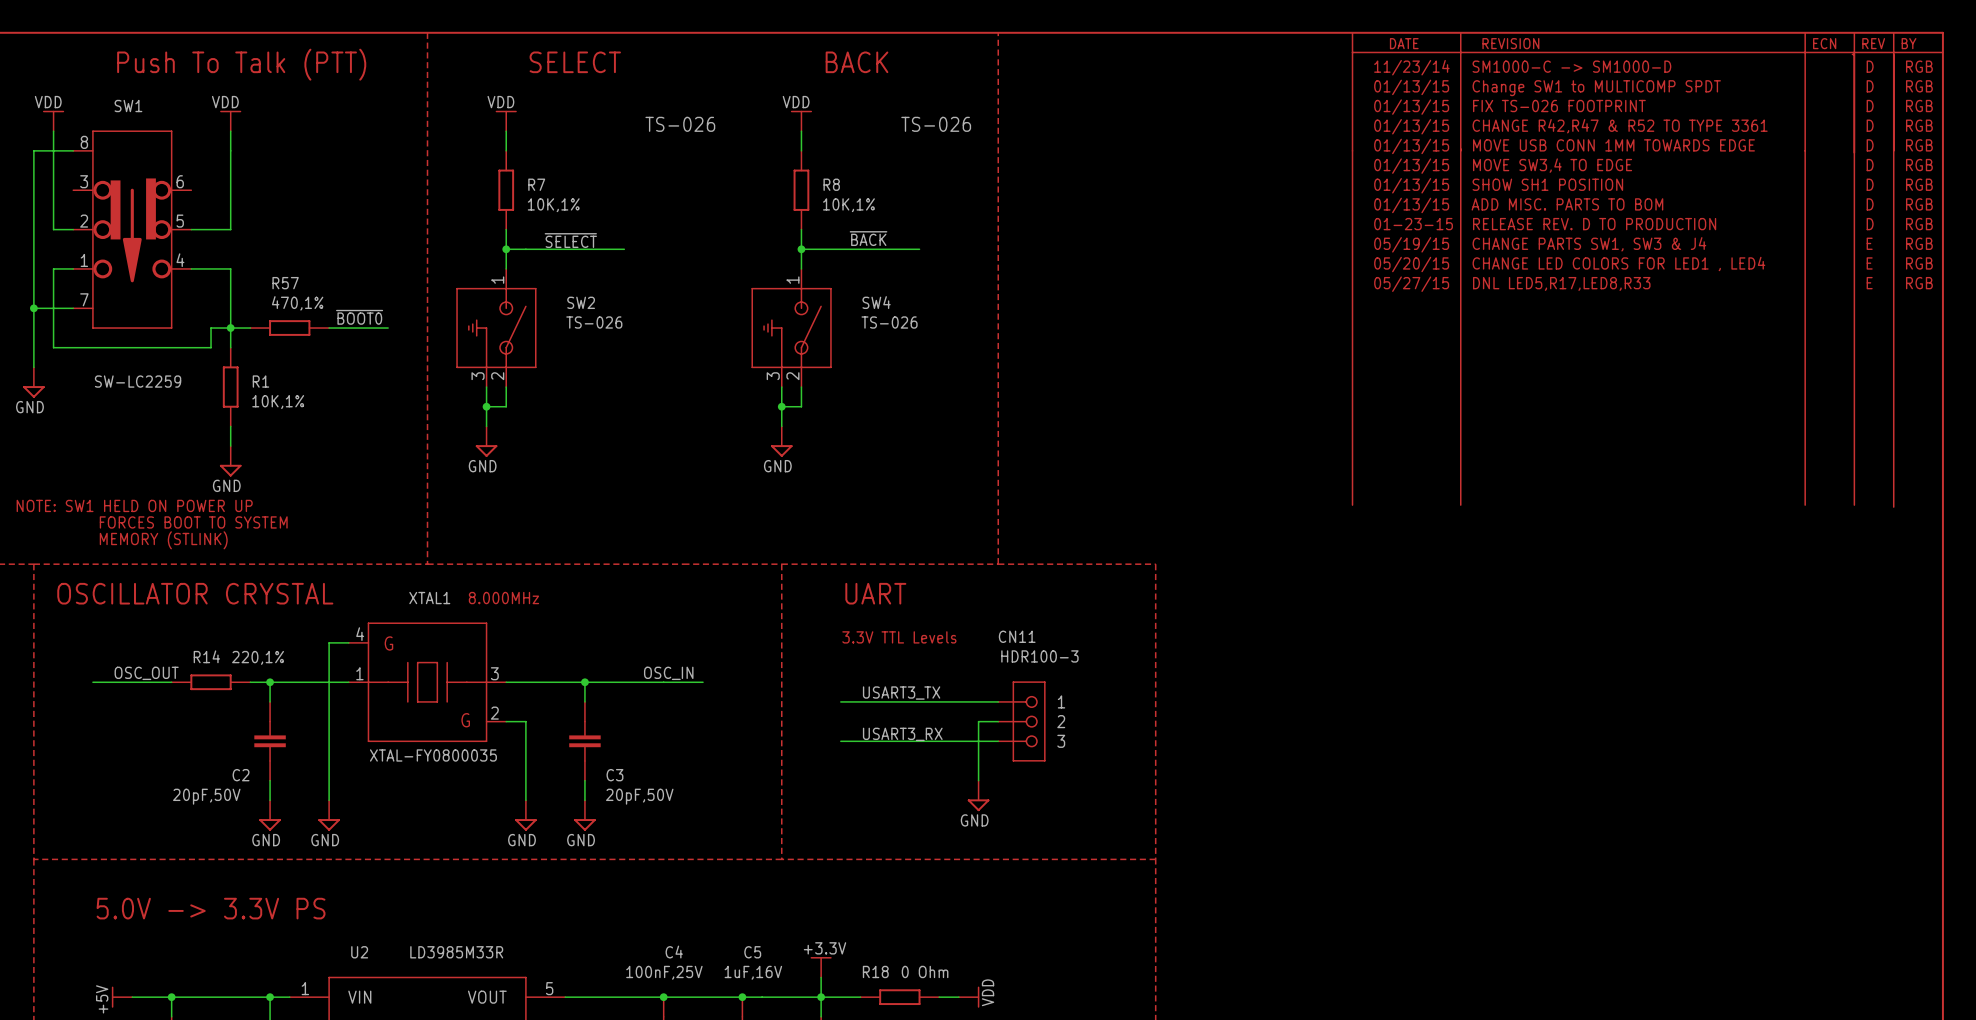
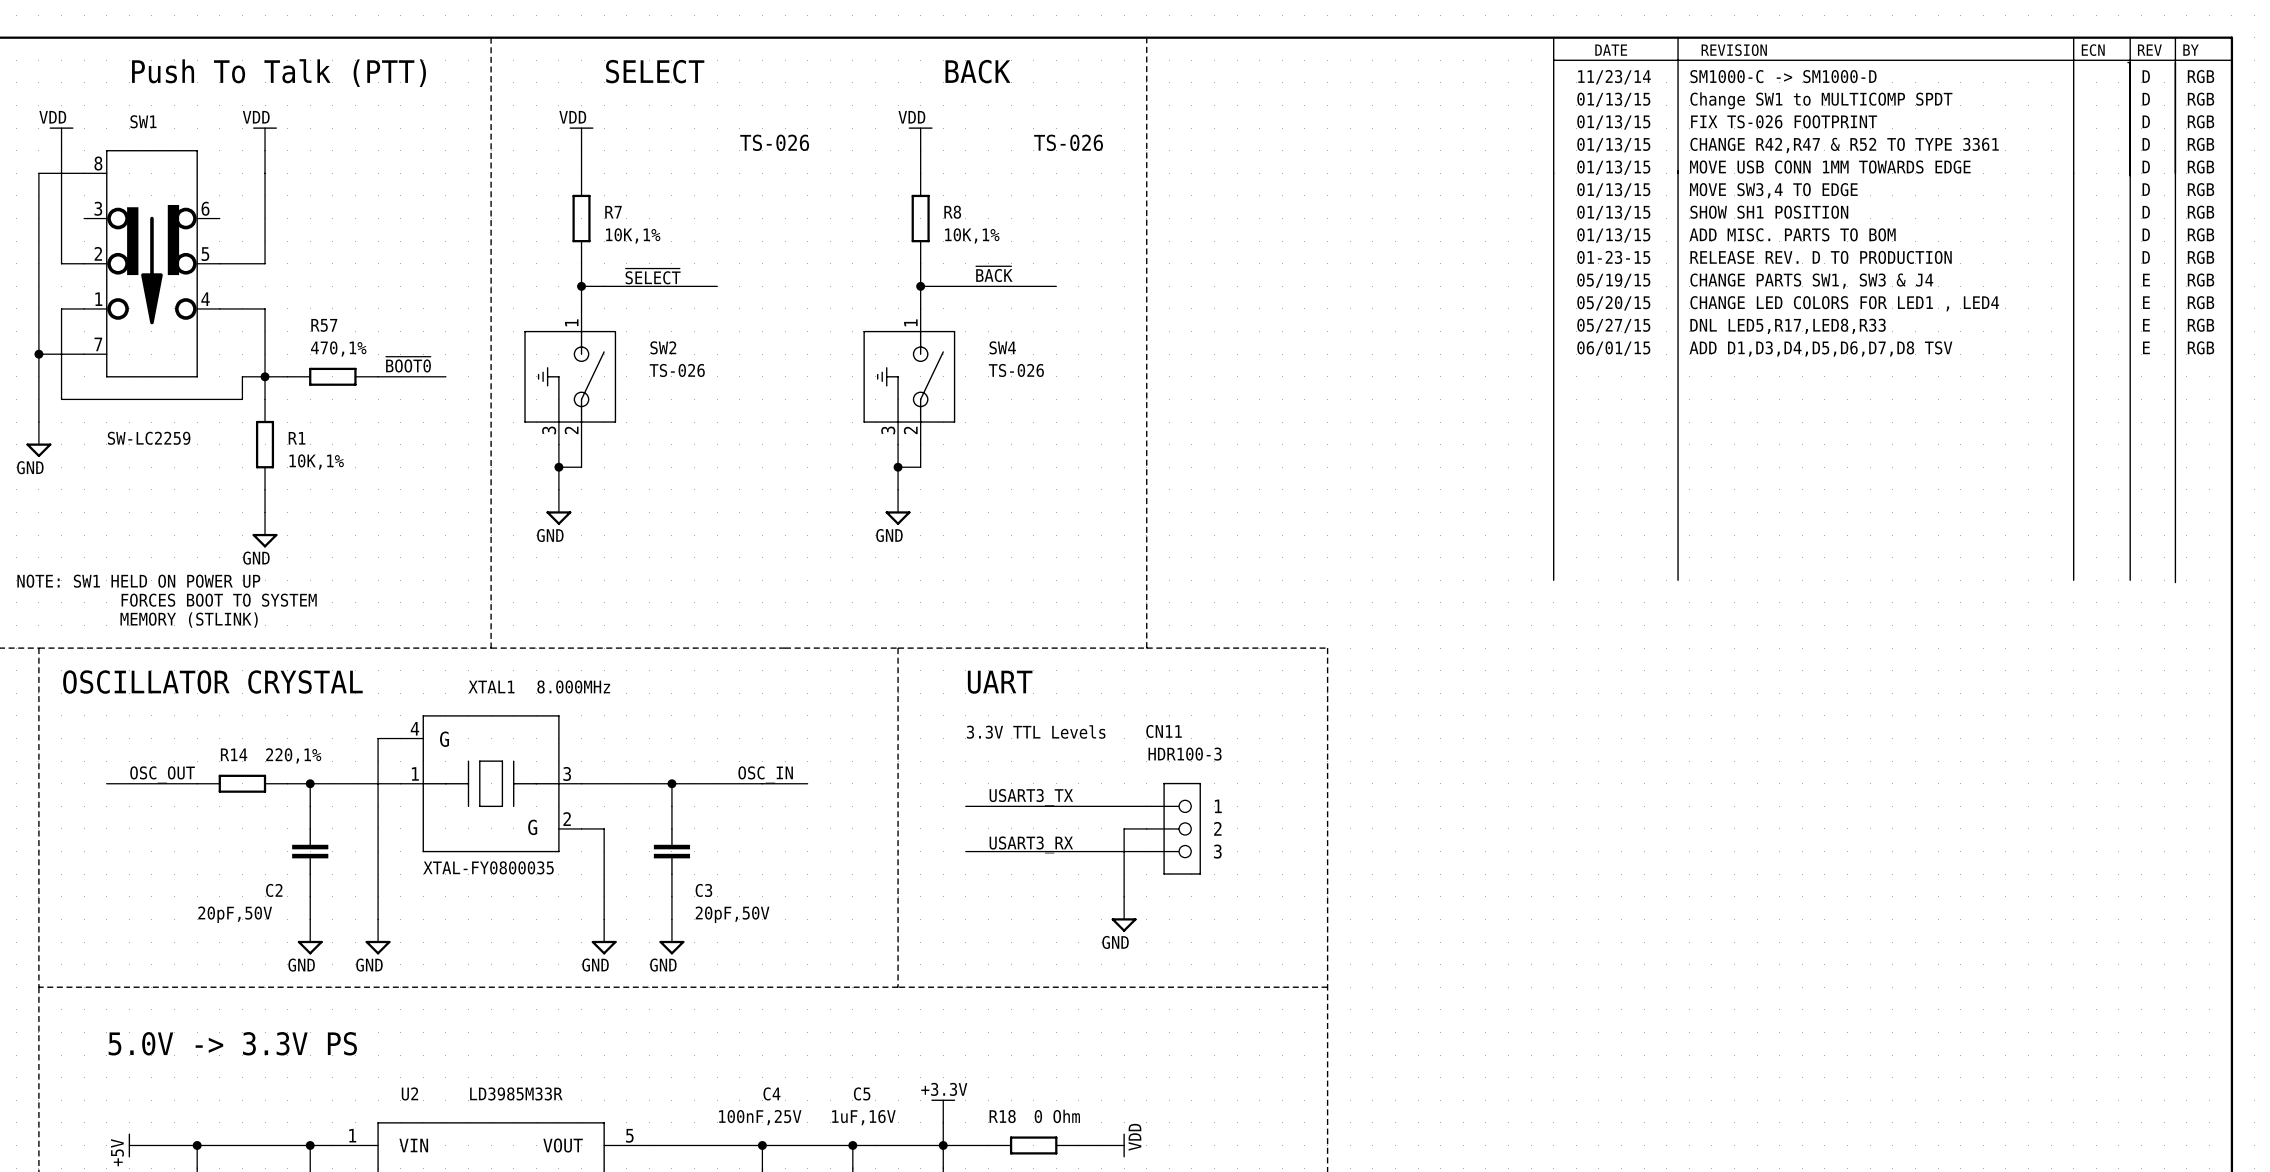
text: none -> E (2146, 347)
text: none -> RGB (2201, 347)
text: none -> 06/01/15 (1613, 348)
text: none -> ADD D1,D3,D4,D5,D6,D7,D8 TSV (1820, 348)

